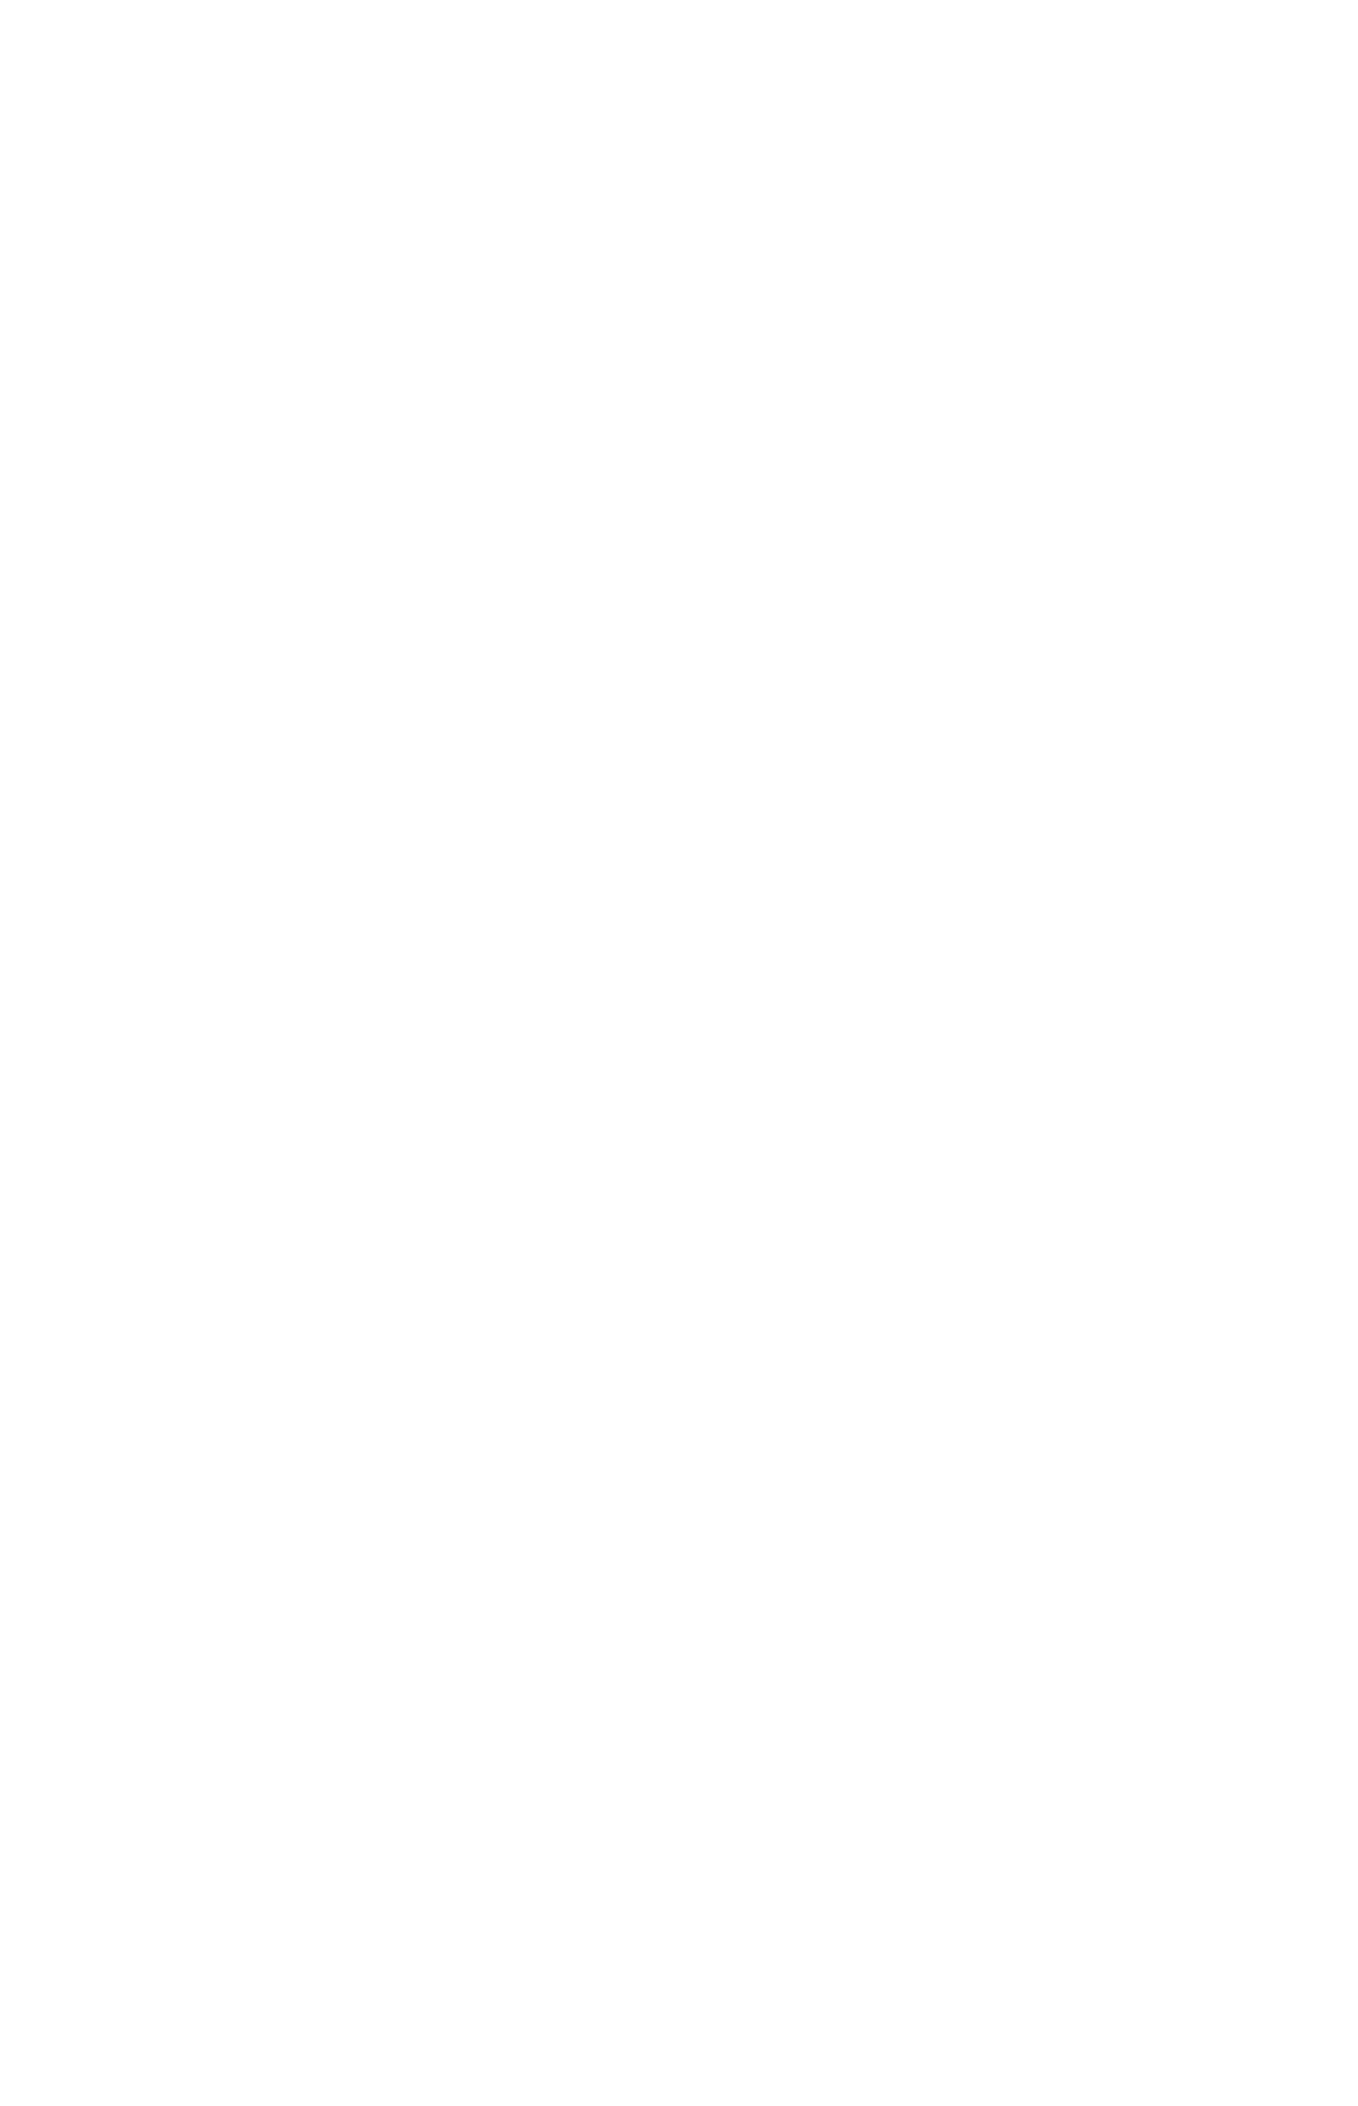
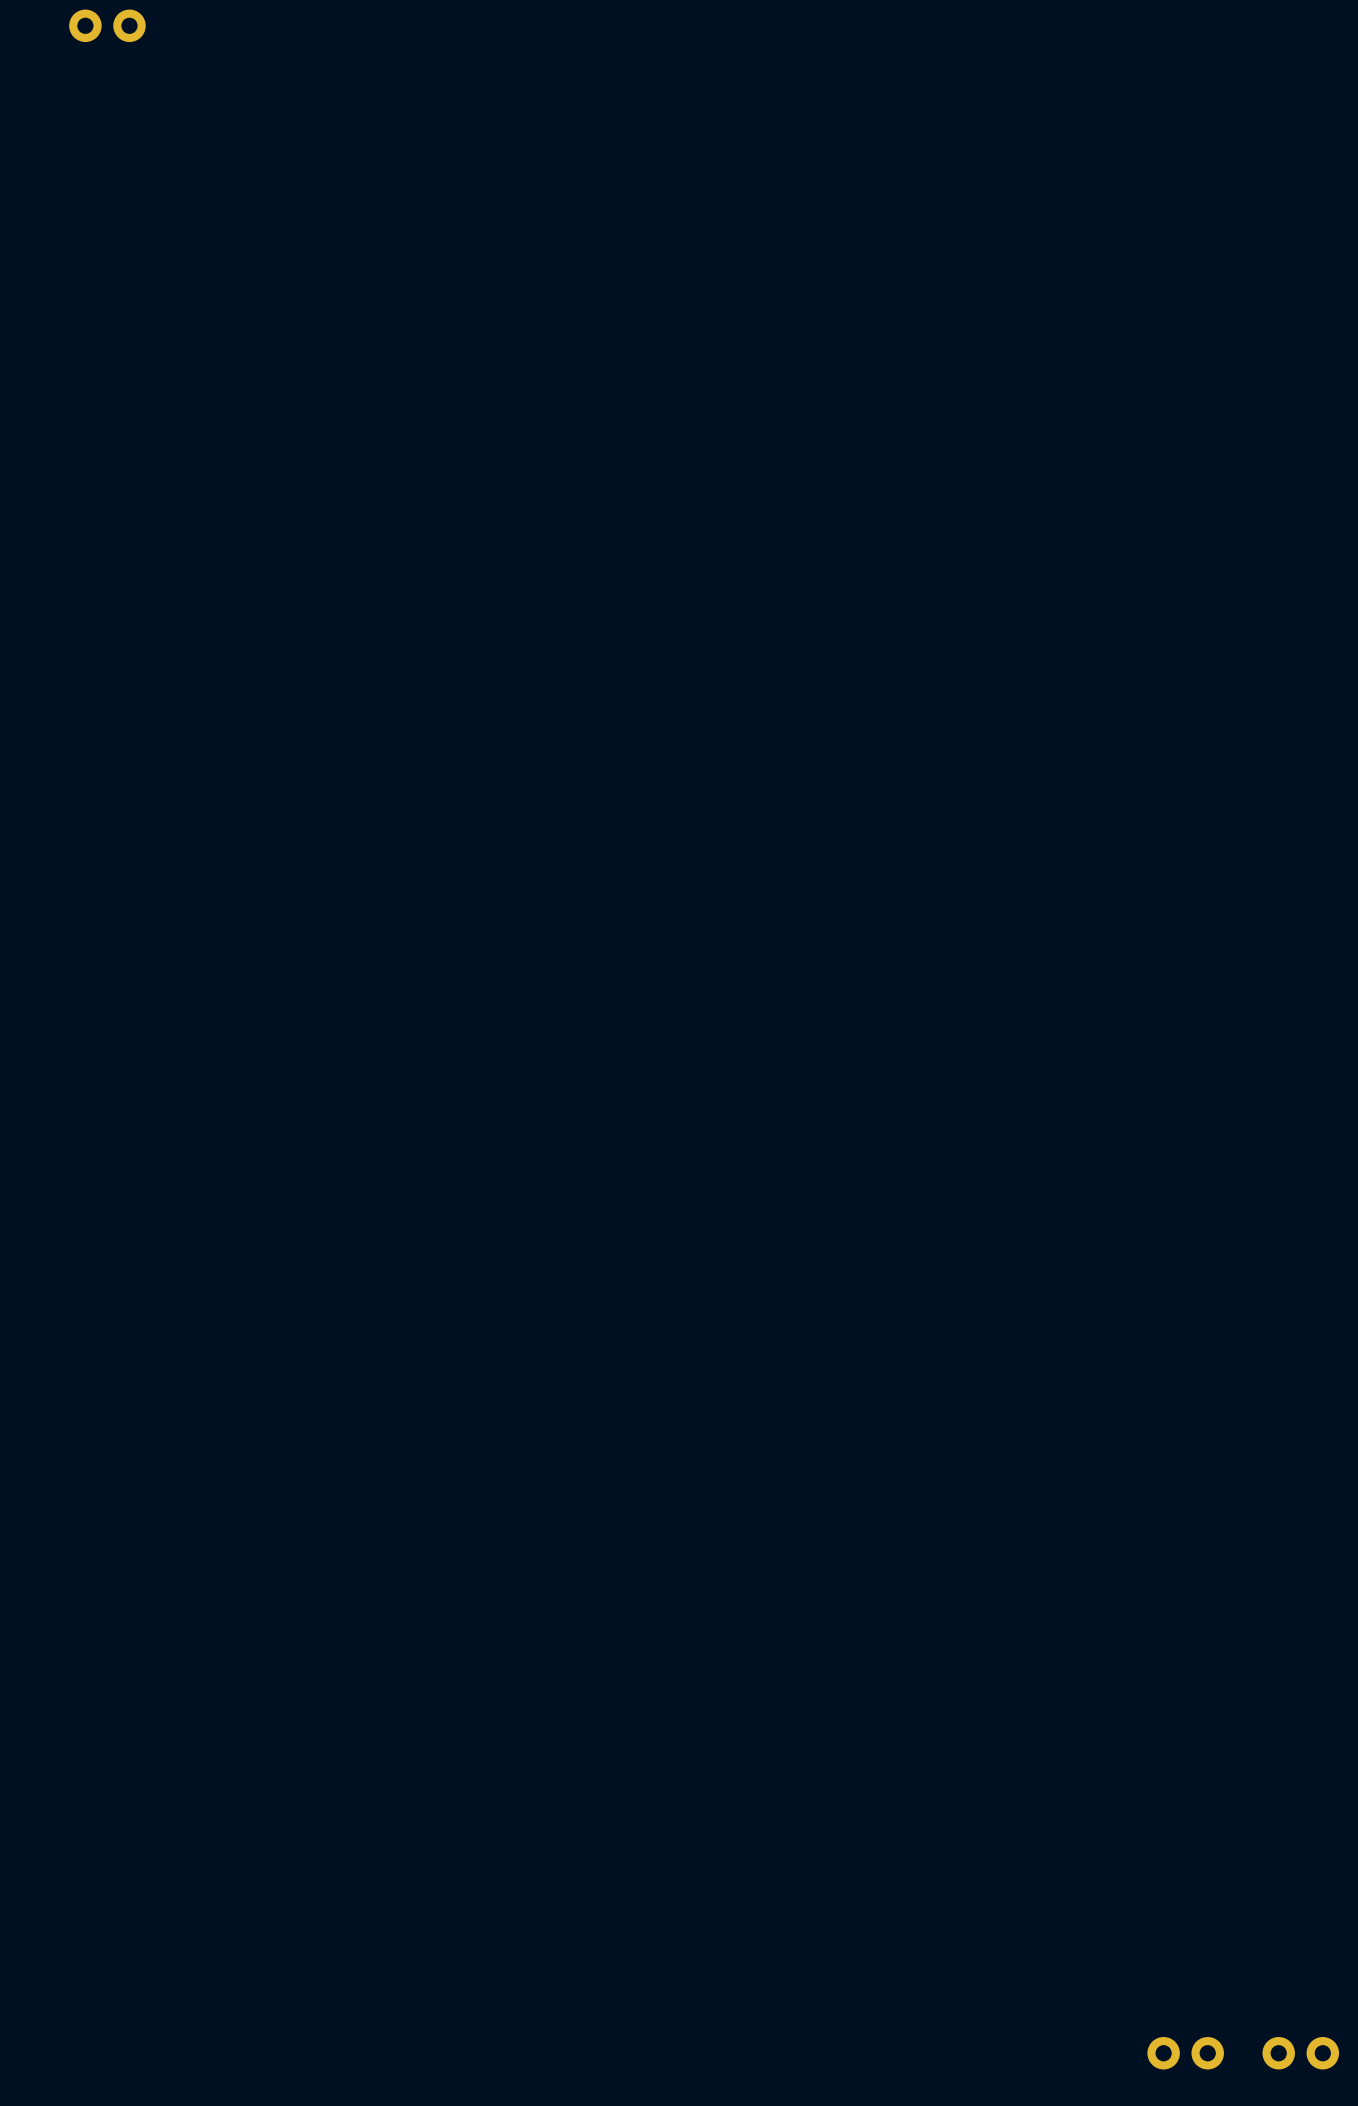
part: none -> (107, 25)
part: none -> (1185, 2053)
part: none -> (1300, 2053)

